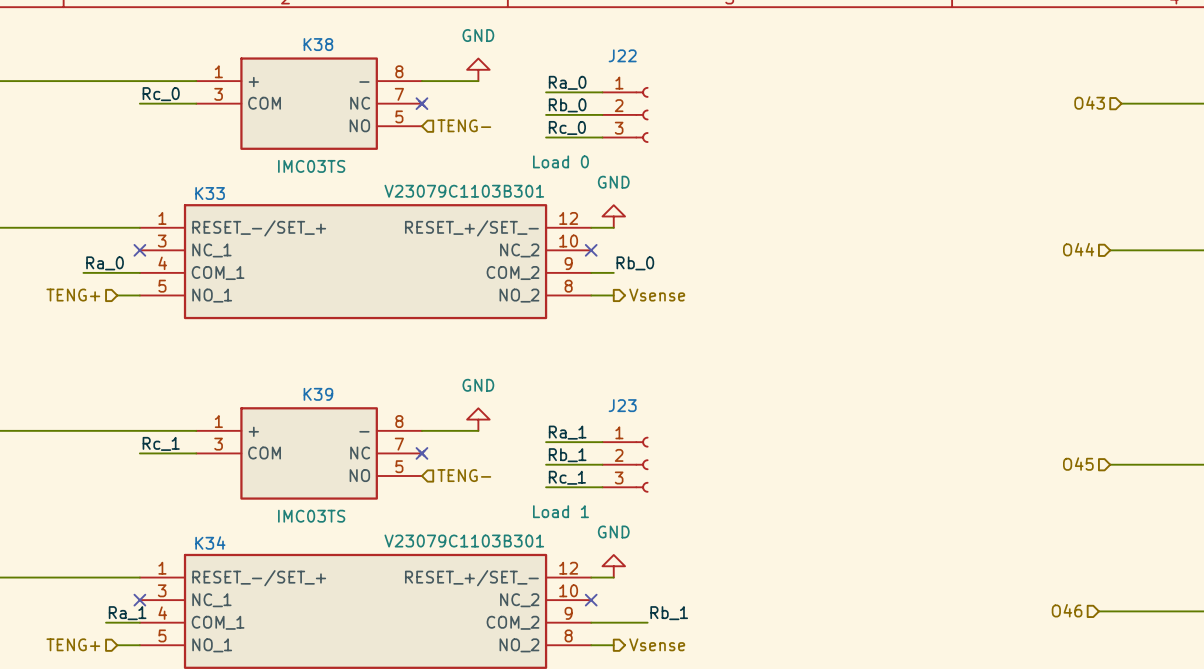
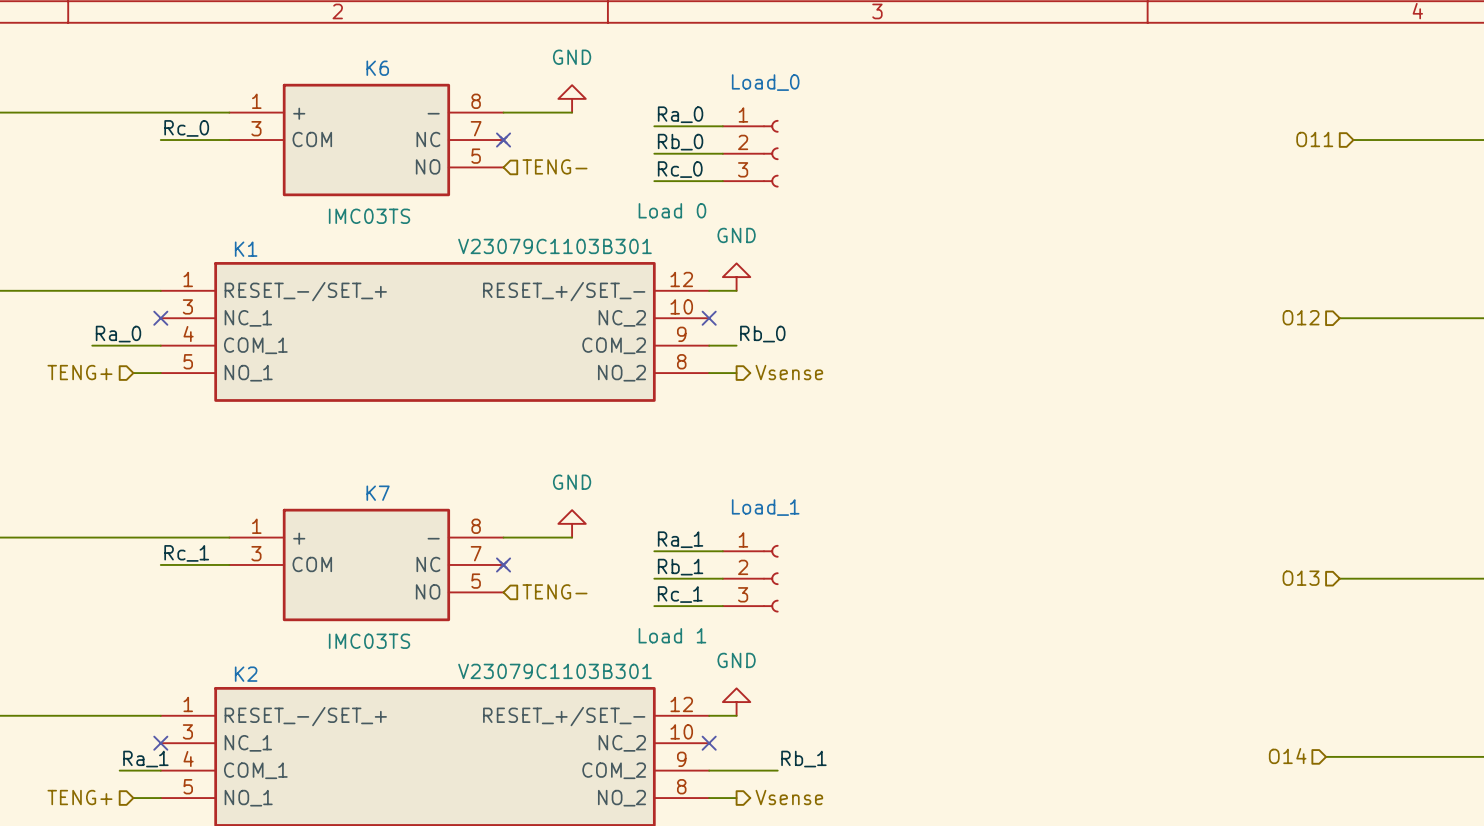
K38 name: K38 (318, 44) -> K6 (377, 68)
J22 name: J22 (622, 55) -> Load_0 (765, 82)
hierarchical label: O43 (1089, 102) -> O11 (1314, 139)
K33 name: K33 (210, 193) -> K1 (246, 249)
hierarchical label: O44 (1078, 249) -> O12 (1301, 317)
K39 name: K39 (318, 394) -> K7 (378, 493)
J23 name: J23 (622, 405) -> Load_1 (765, 507)
hierarchical label: O45 (1078, 464) -> O13 (1301, 578)
K34 name: K34 (210, 543) -> K2 (246, 674)
hierarchical label: O46 (1067, 610) -> O14 (1287, 756)

